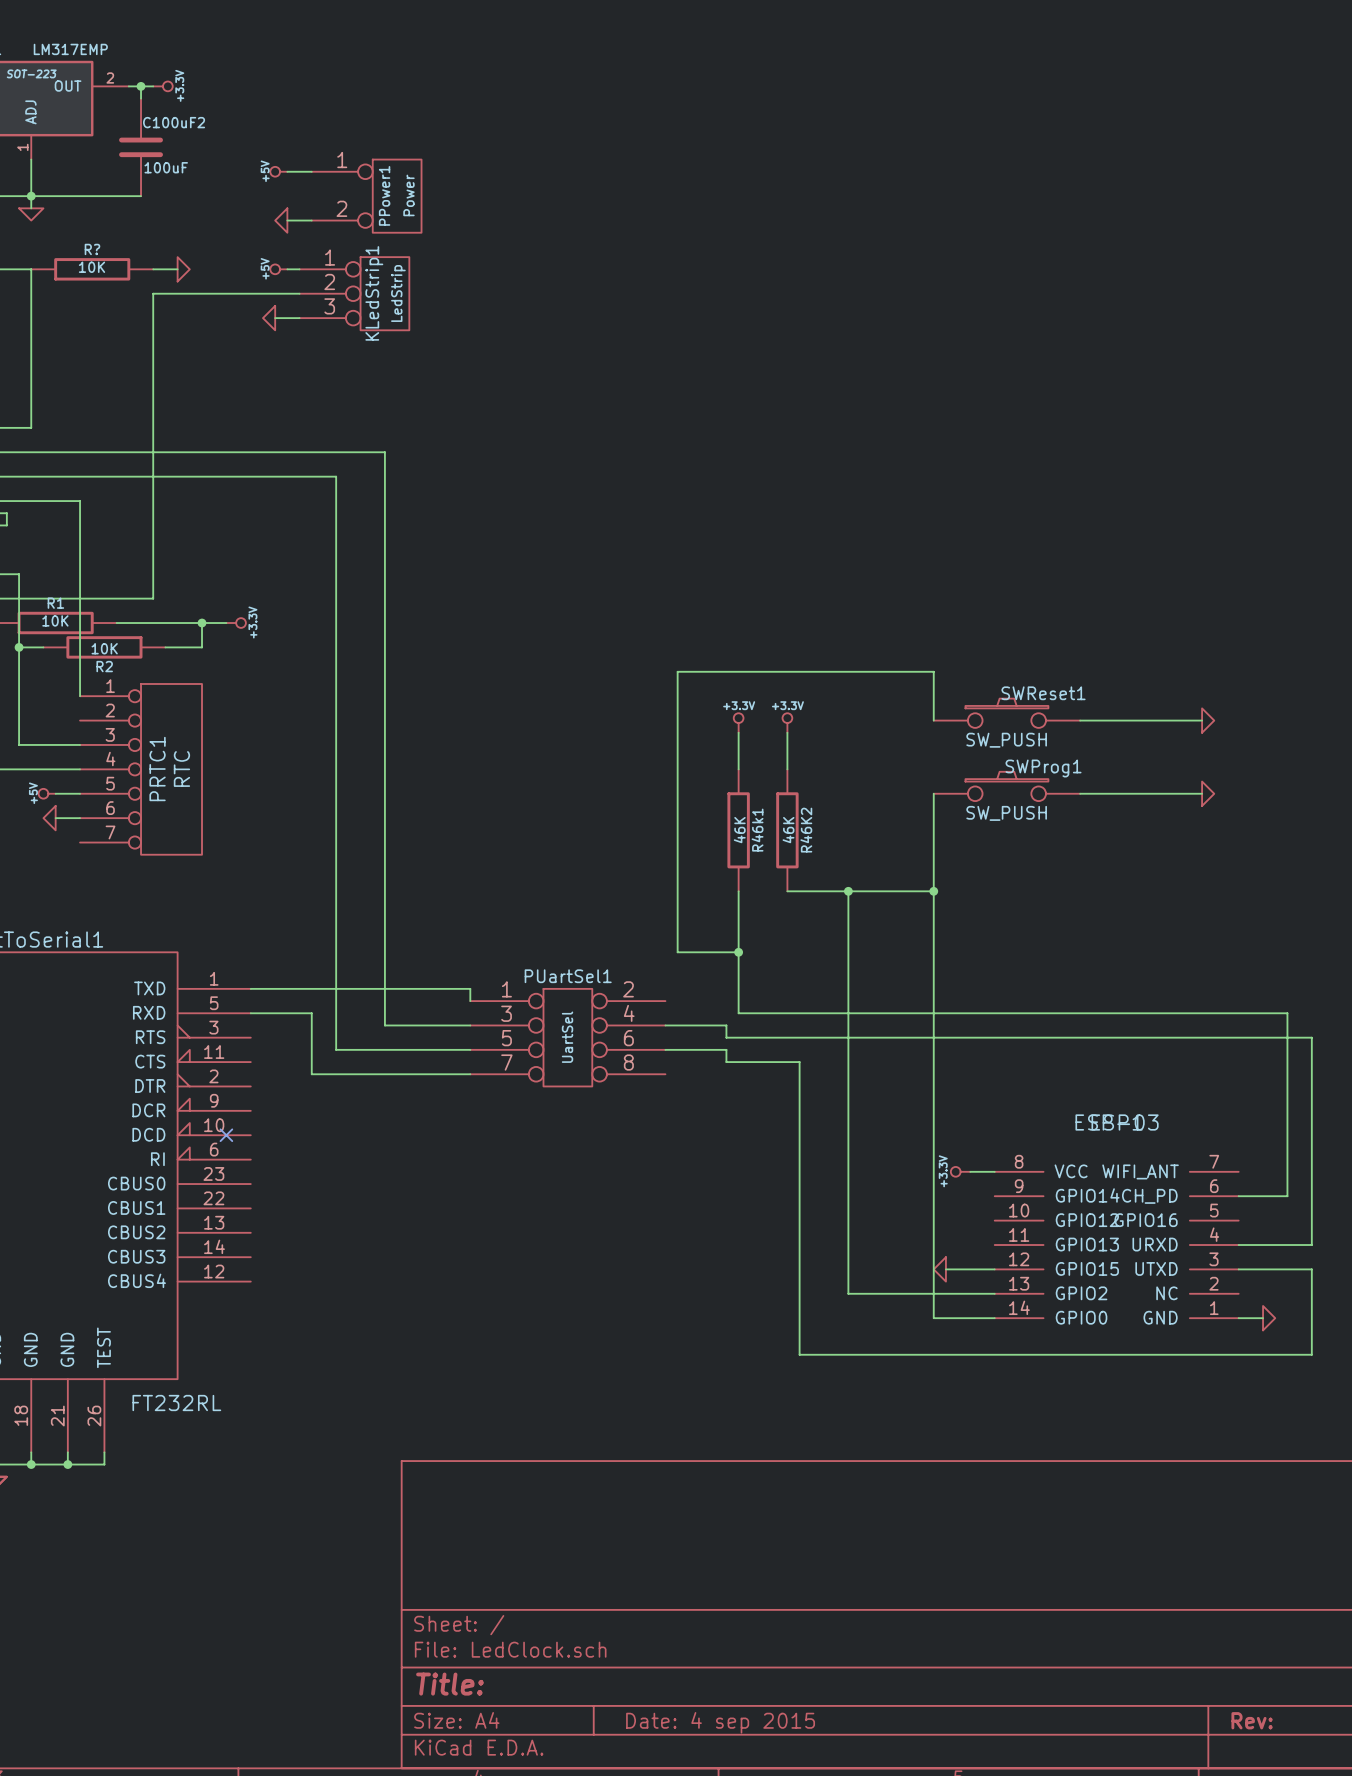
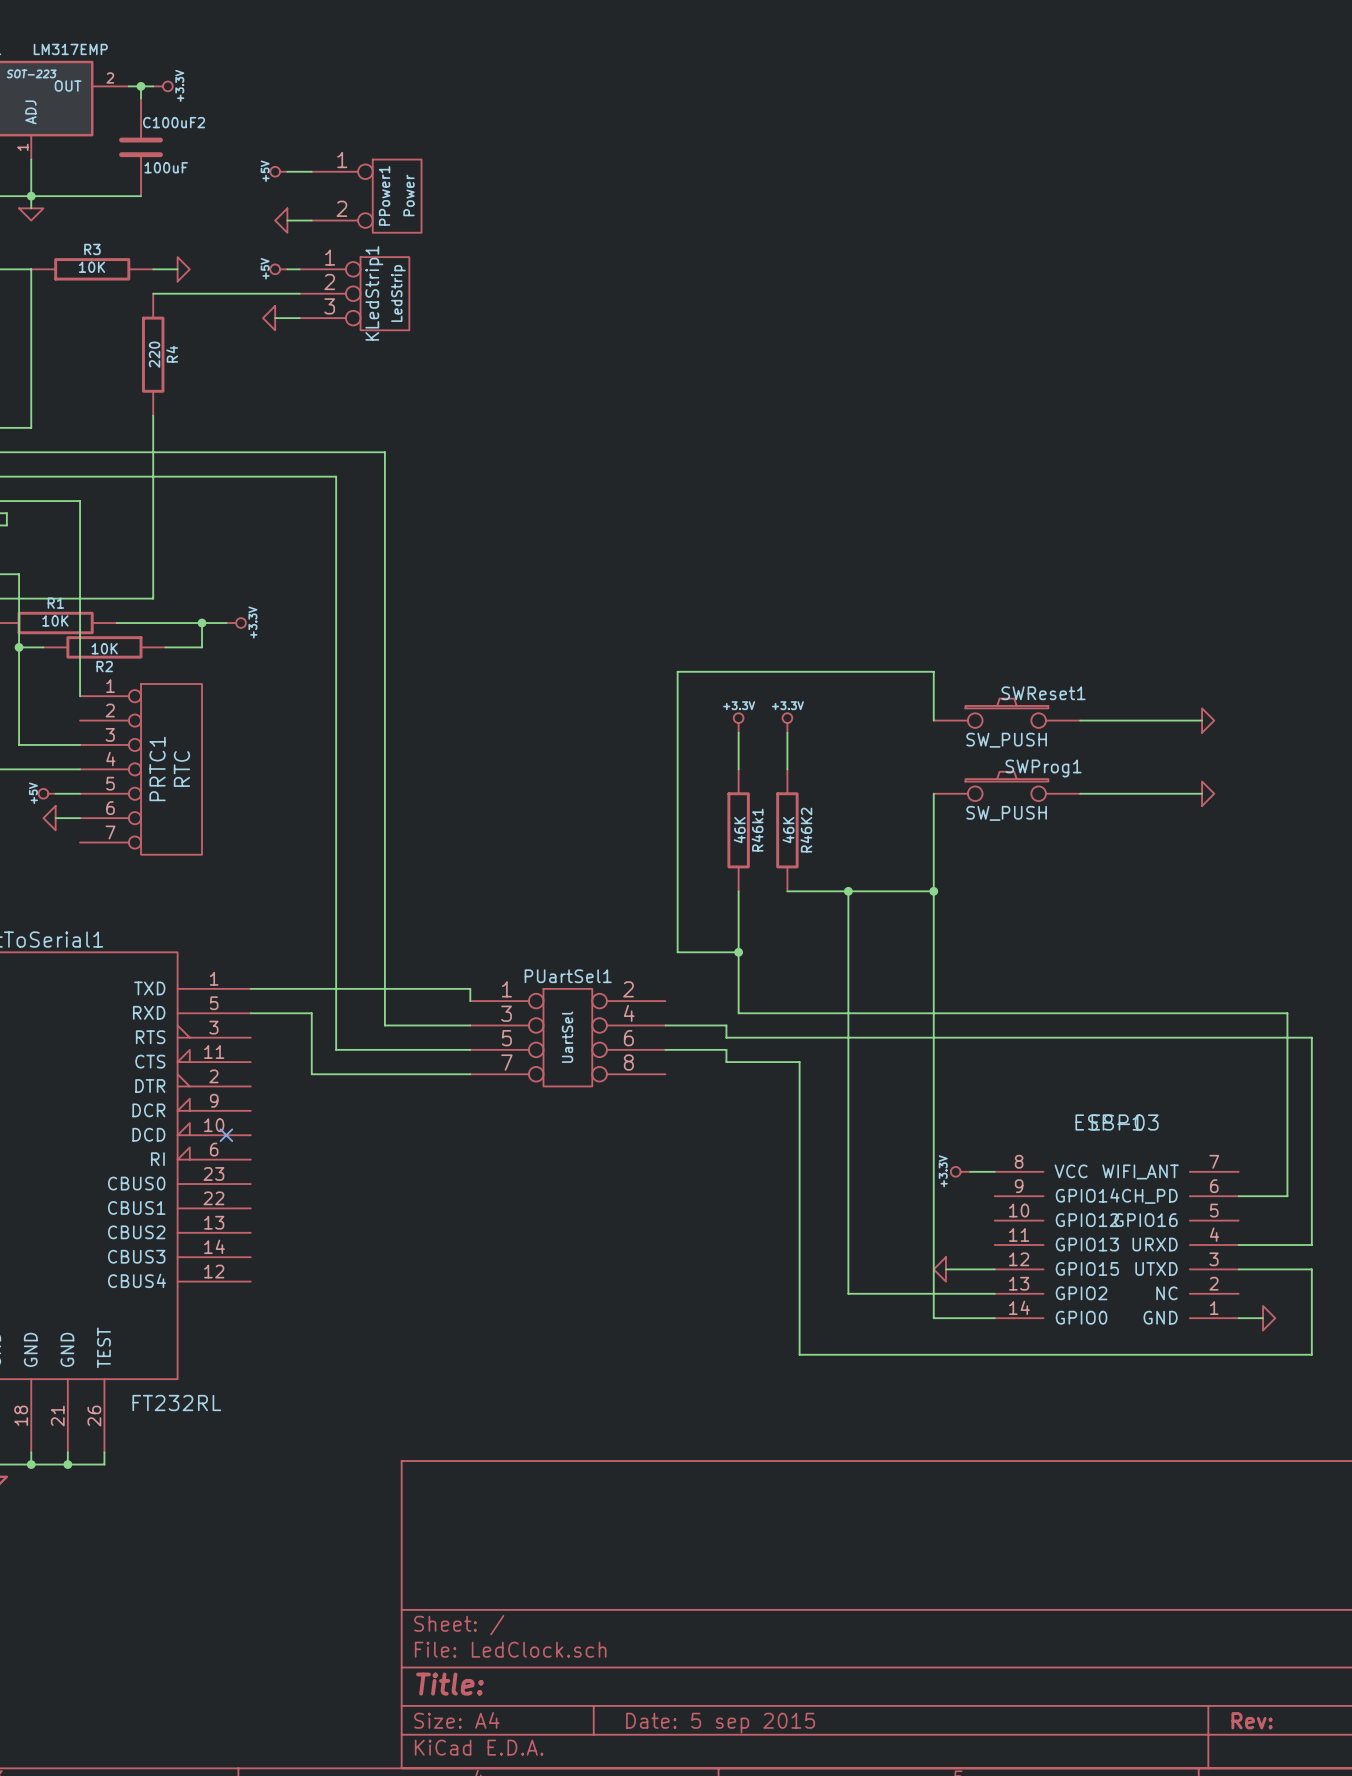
R? name: R? (92, 249) -> R3 (92, 249)
wire: (153, 293) (153, 415) -> none
R4: none -> 220 (153, 354)
title block: Date: 4 sep 2015 (720, 1722) -> Date: 5 sep 2015 (720, 1723)

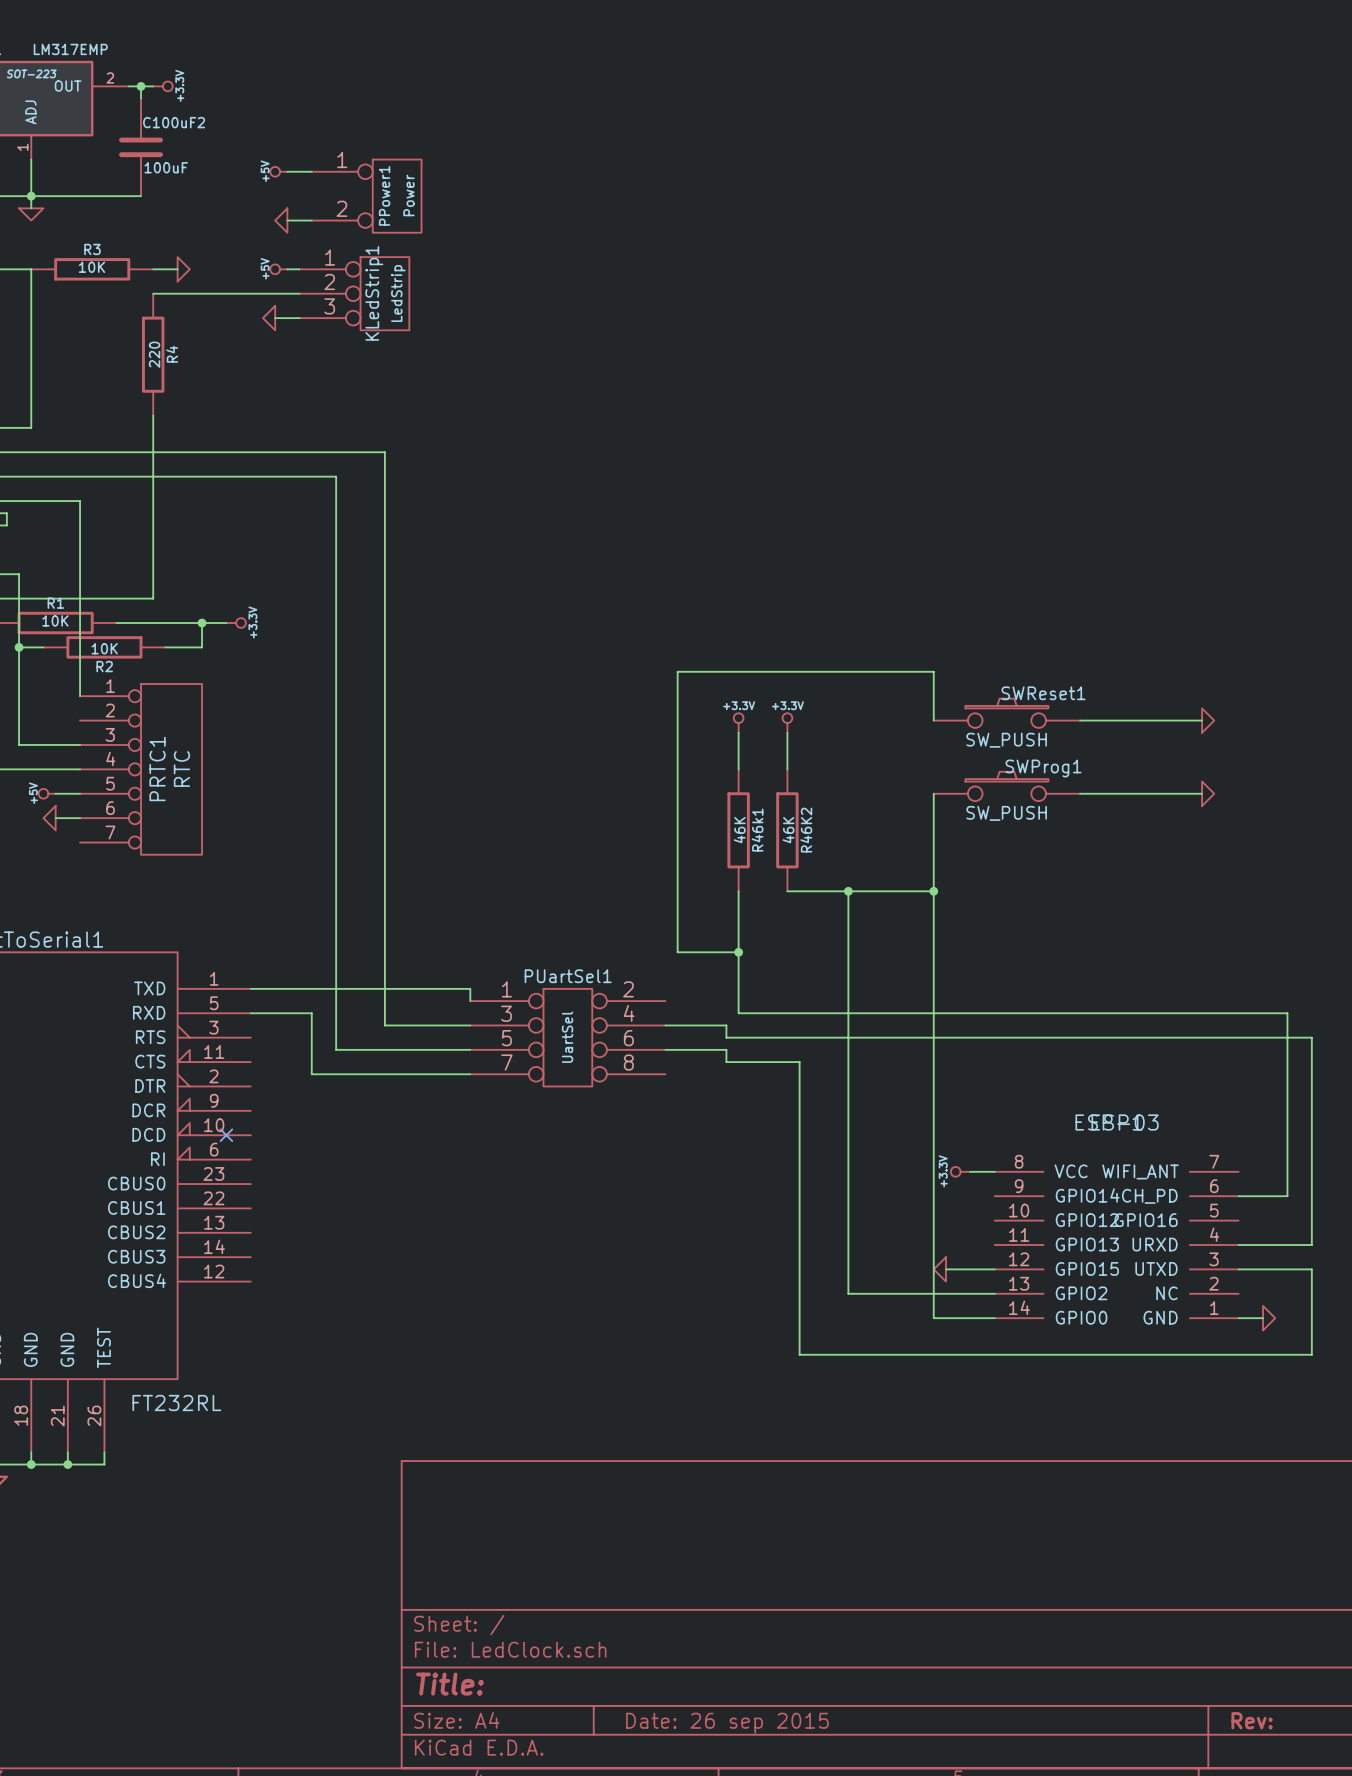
title block: Date: 5 sep 2015 (720, 1723) -> Date: 26 sep 2015 (727, 1723)

